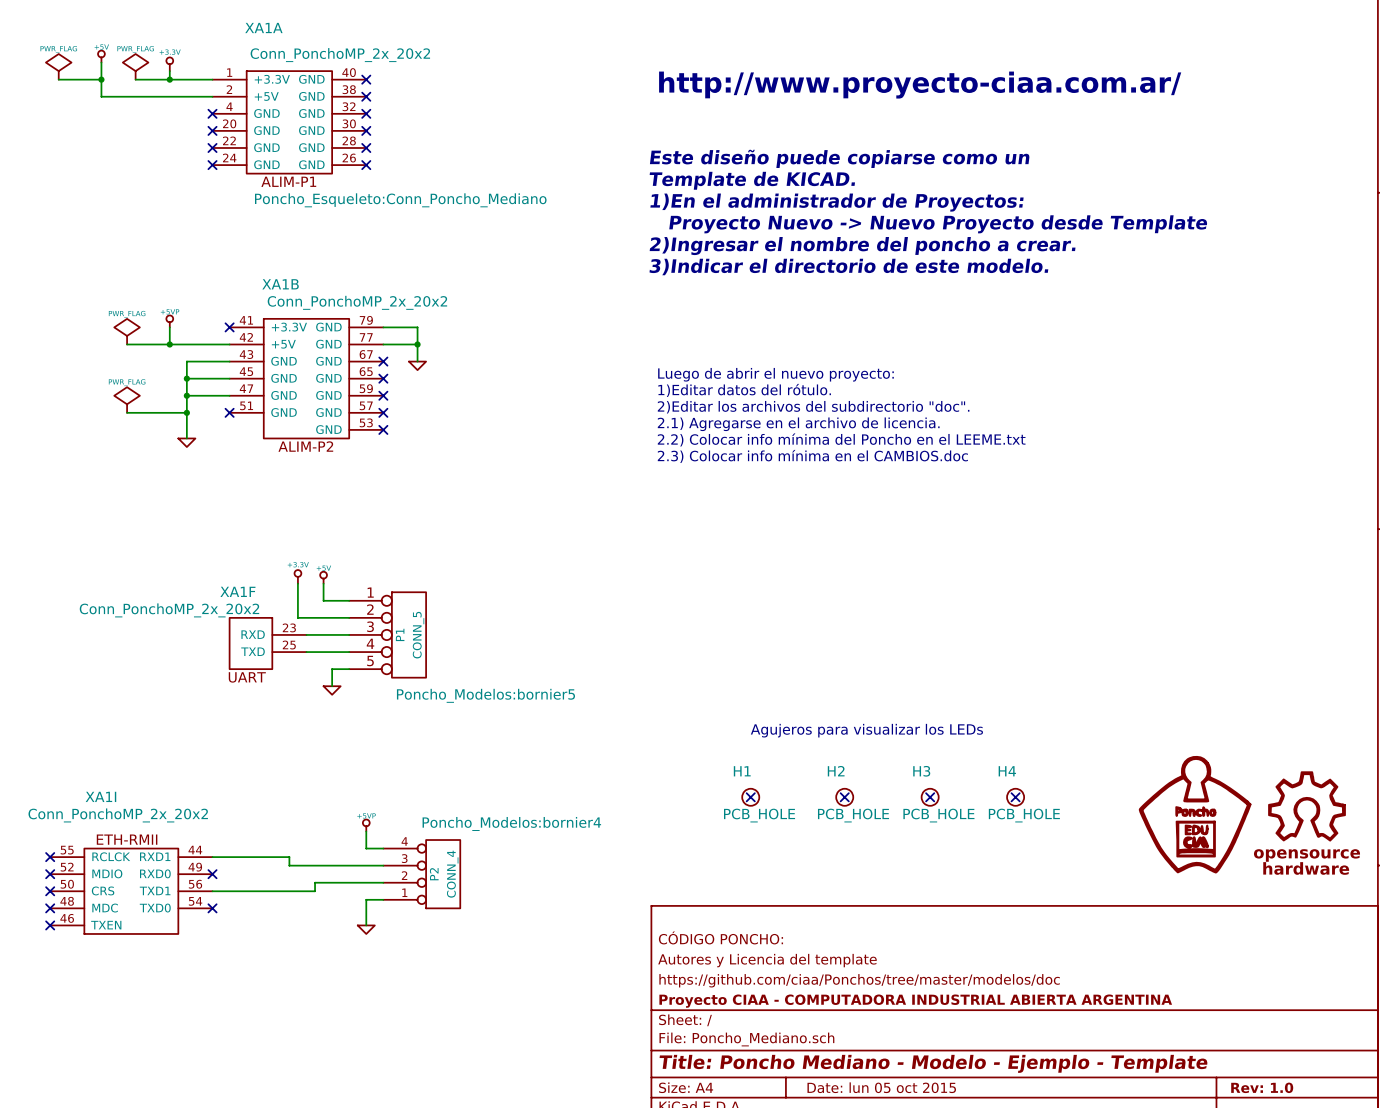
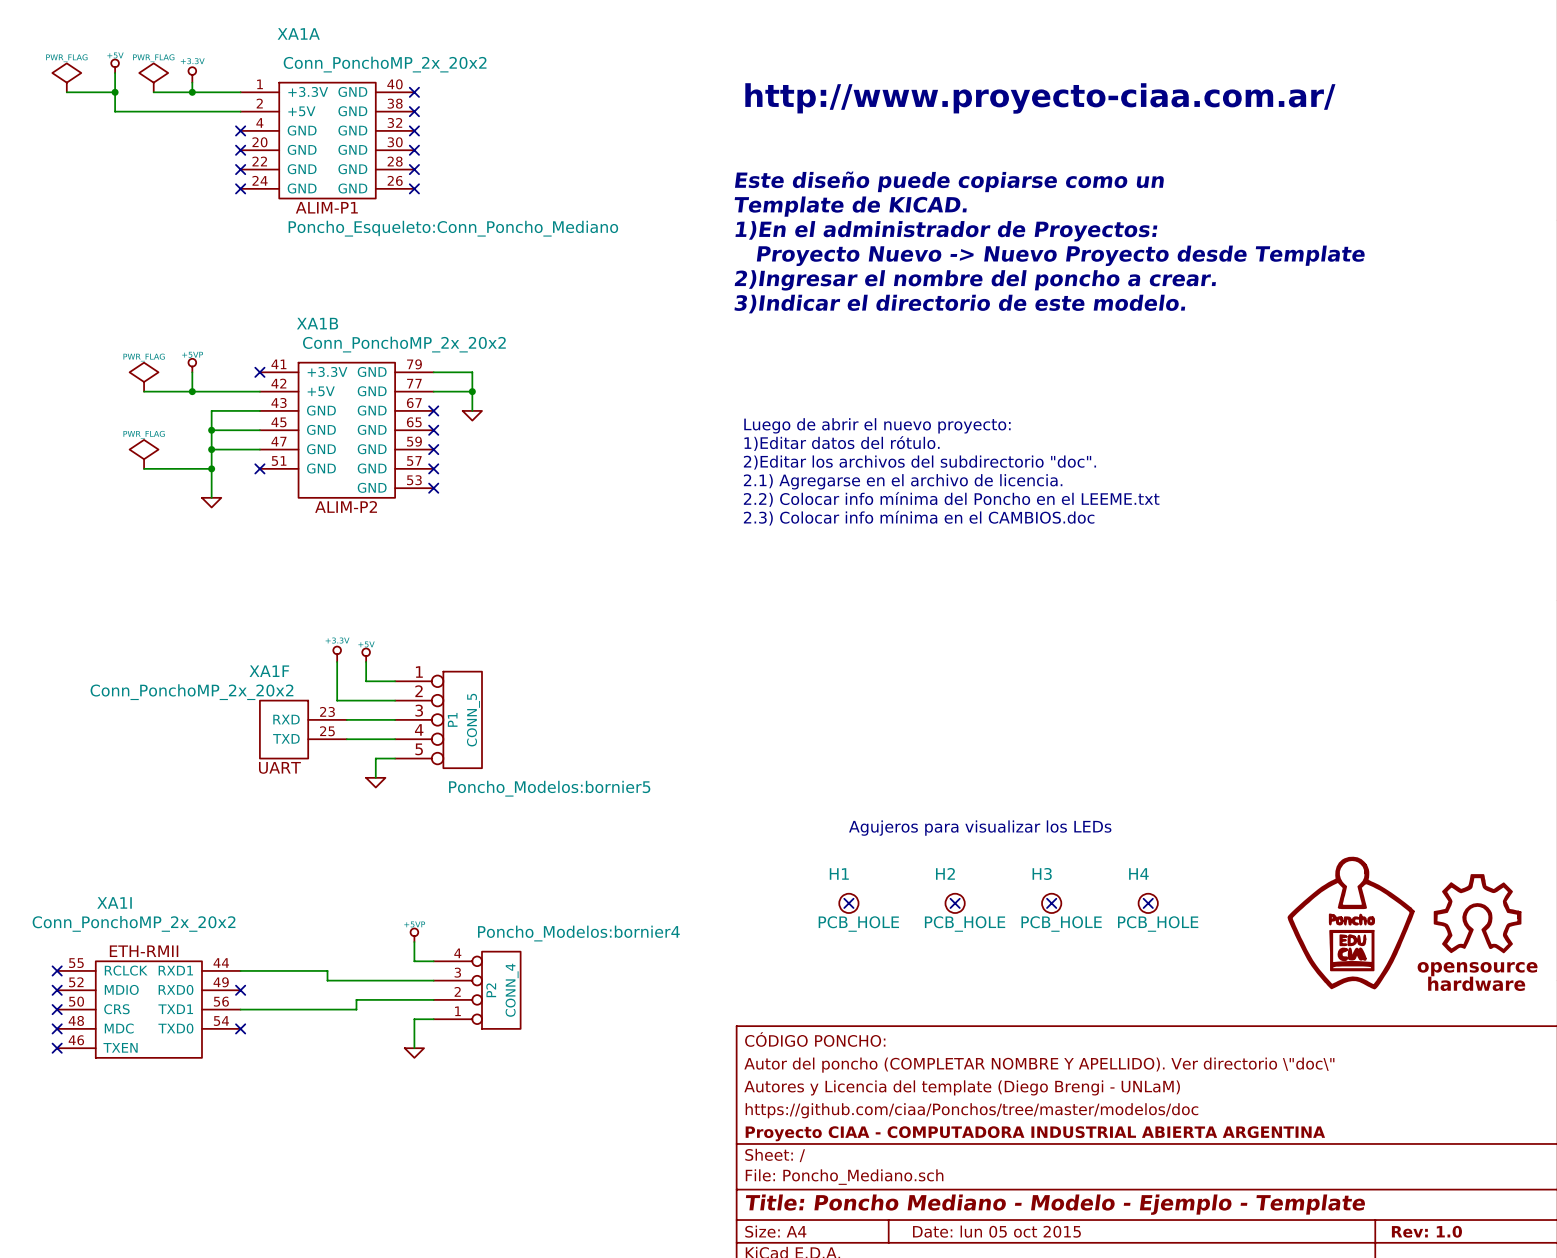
title block: none -> CÓDIGO PONCHO: (815, 1039)
title block: CÓDIGO PONCHO: (720, 937) -> Autor del poncho (COMPLETAR NOMBRE Y APELLIDO). Ver directorio \"doc\" (1039, 1065)
title block: Autores y Licencia del template (767, 960) -> Autores y Licencia del template (Diego Brengi - UNLaM) (962, 1087)

